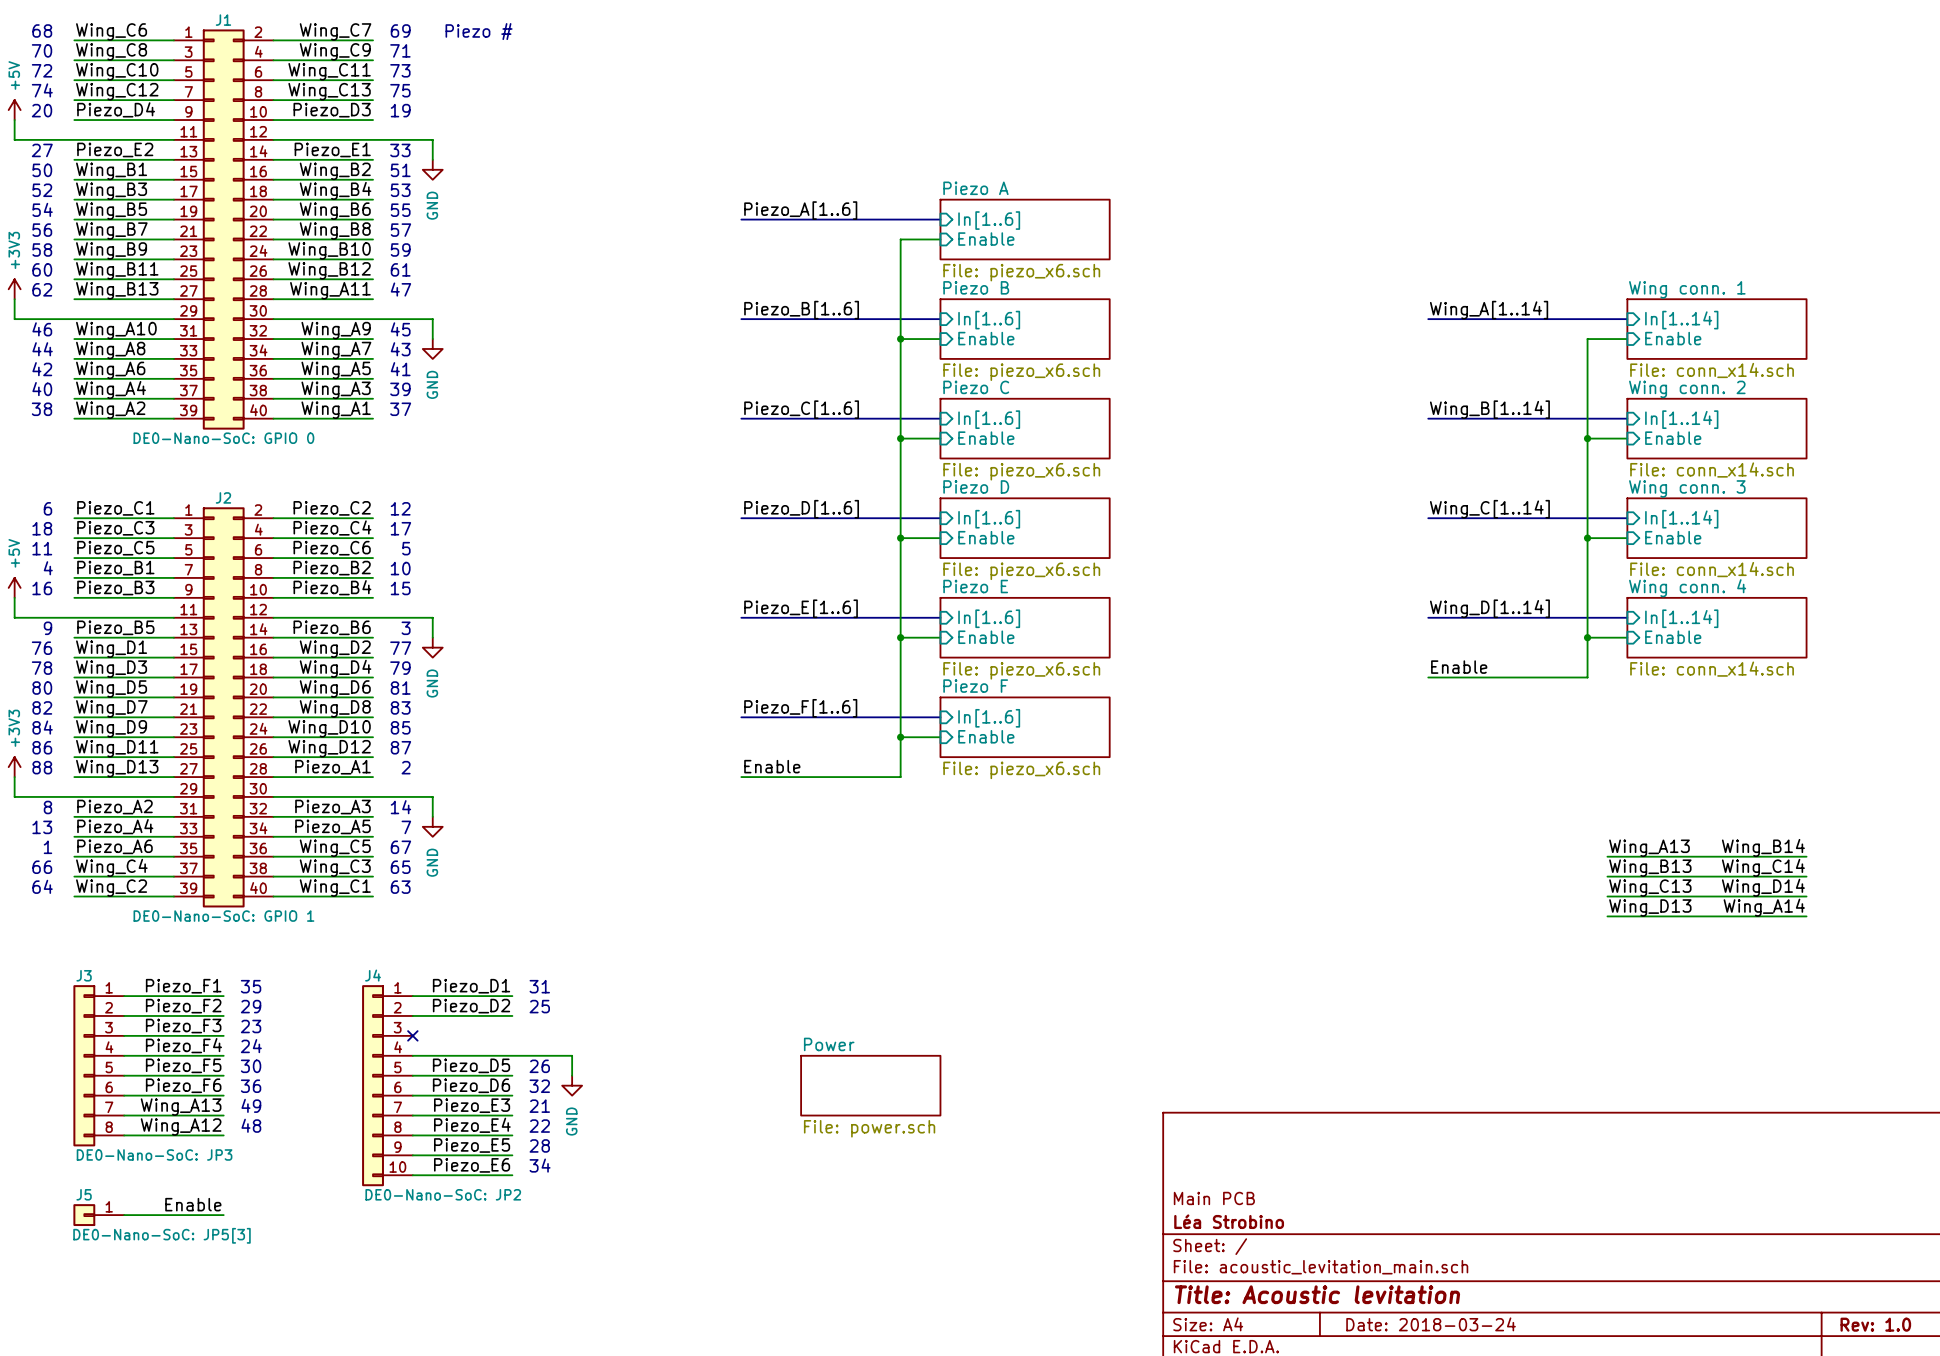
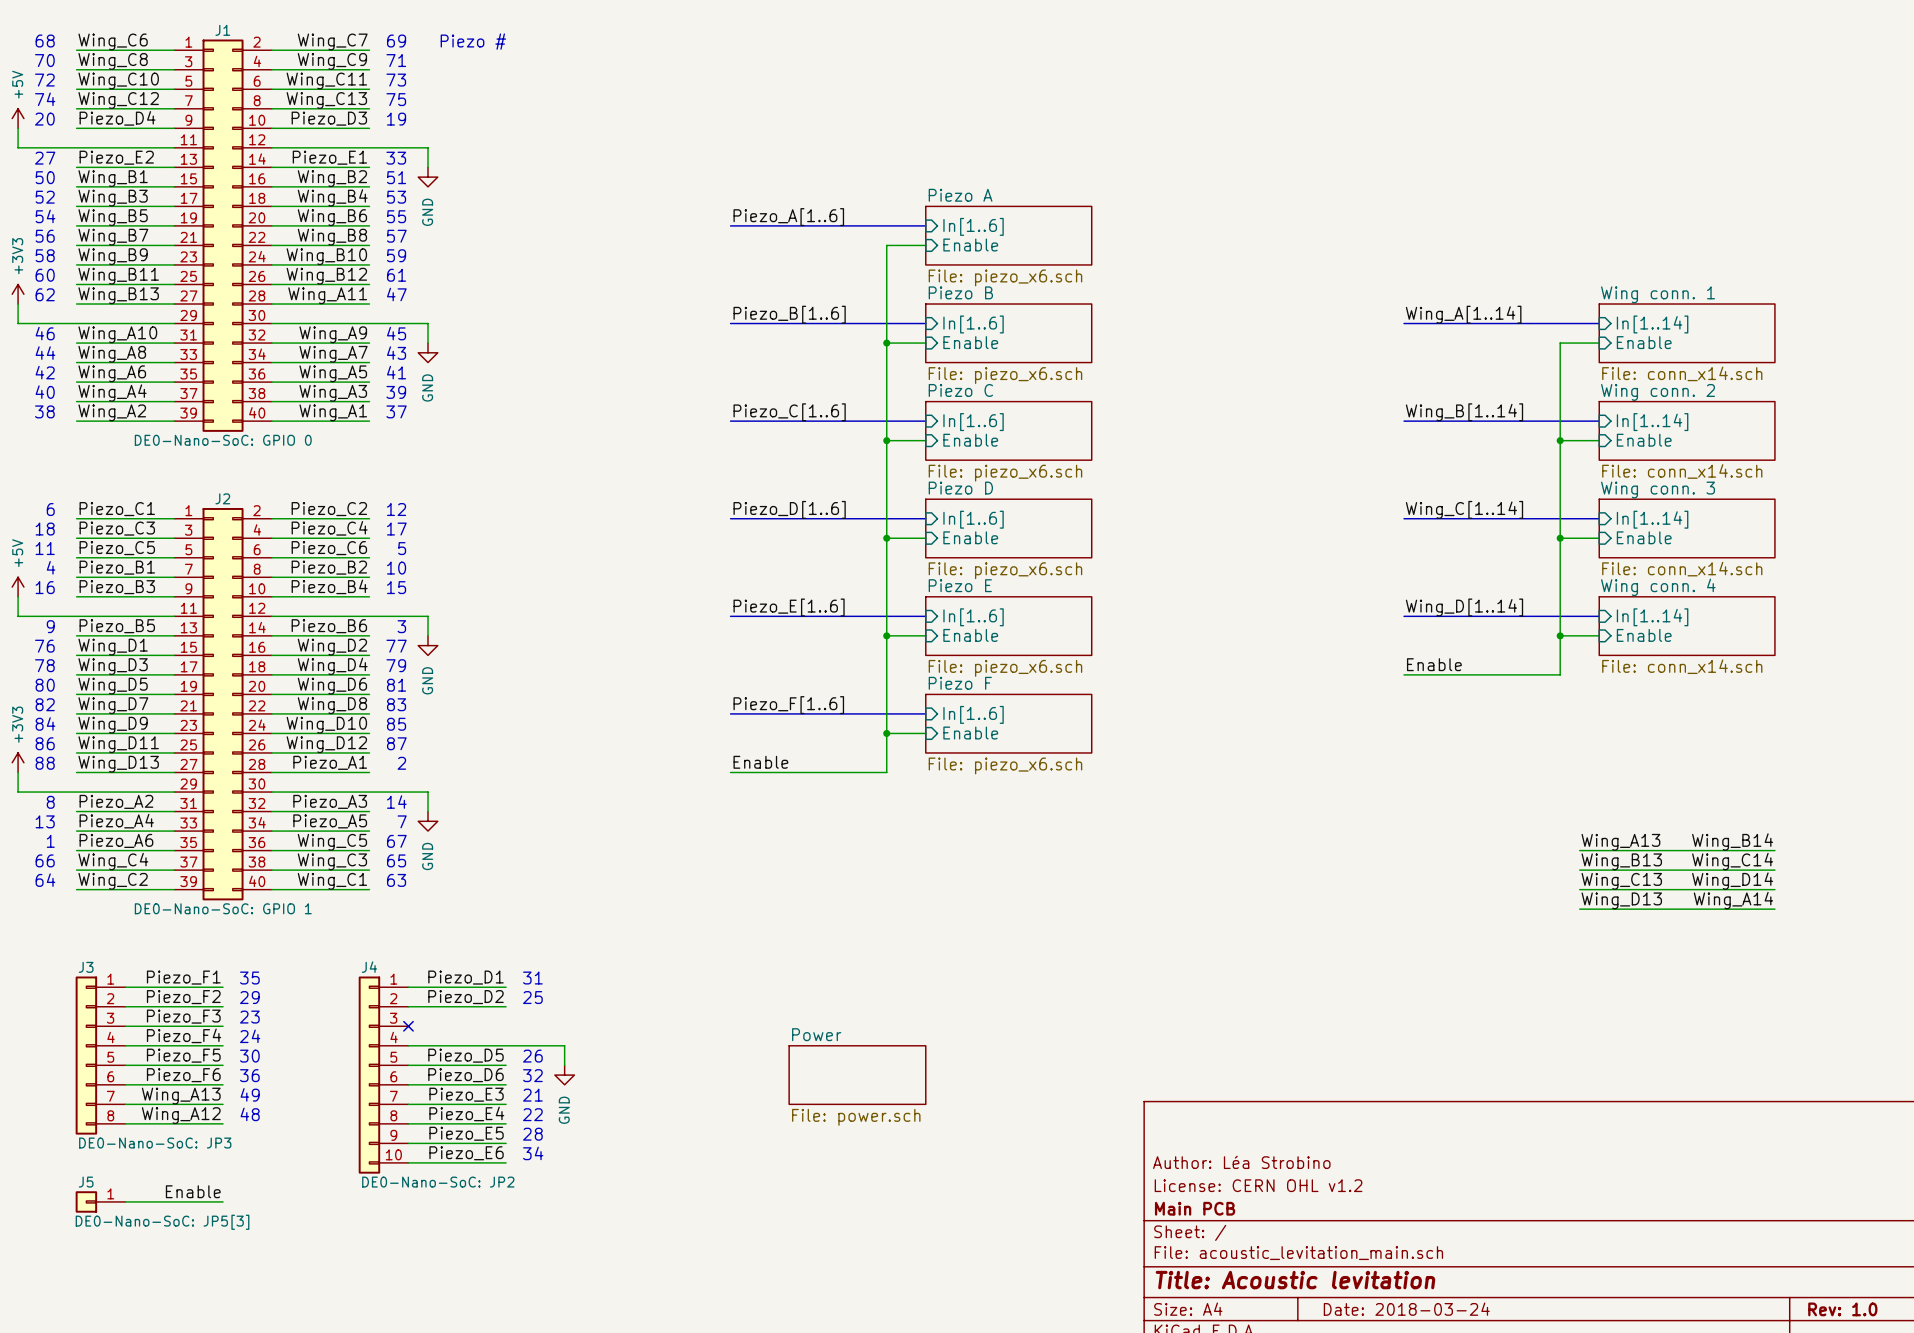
title block: none -> Author: Léa Strobino (1241, 1162)
title block: Main PCB (1214, 1198) -> License: CERN OHL v1.2 (1258, 1185)
title block: Léa Strobino (1229, 1221) -> Main PCB (1195, 1208)

